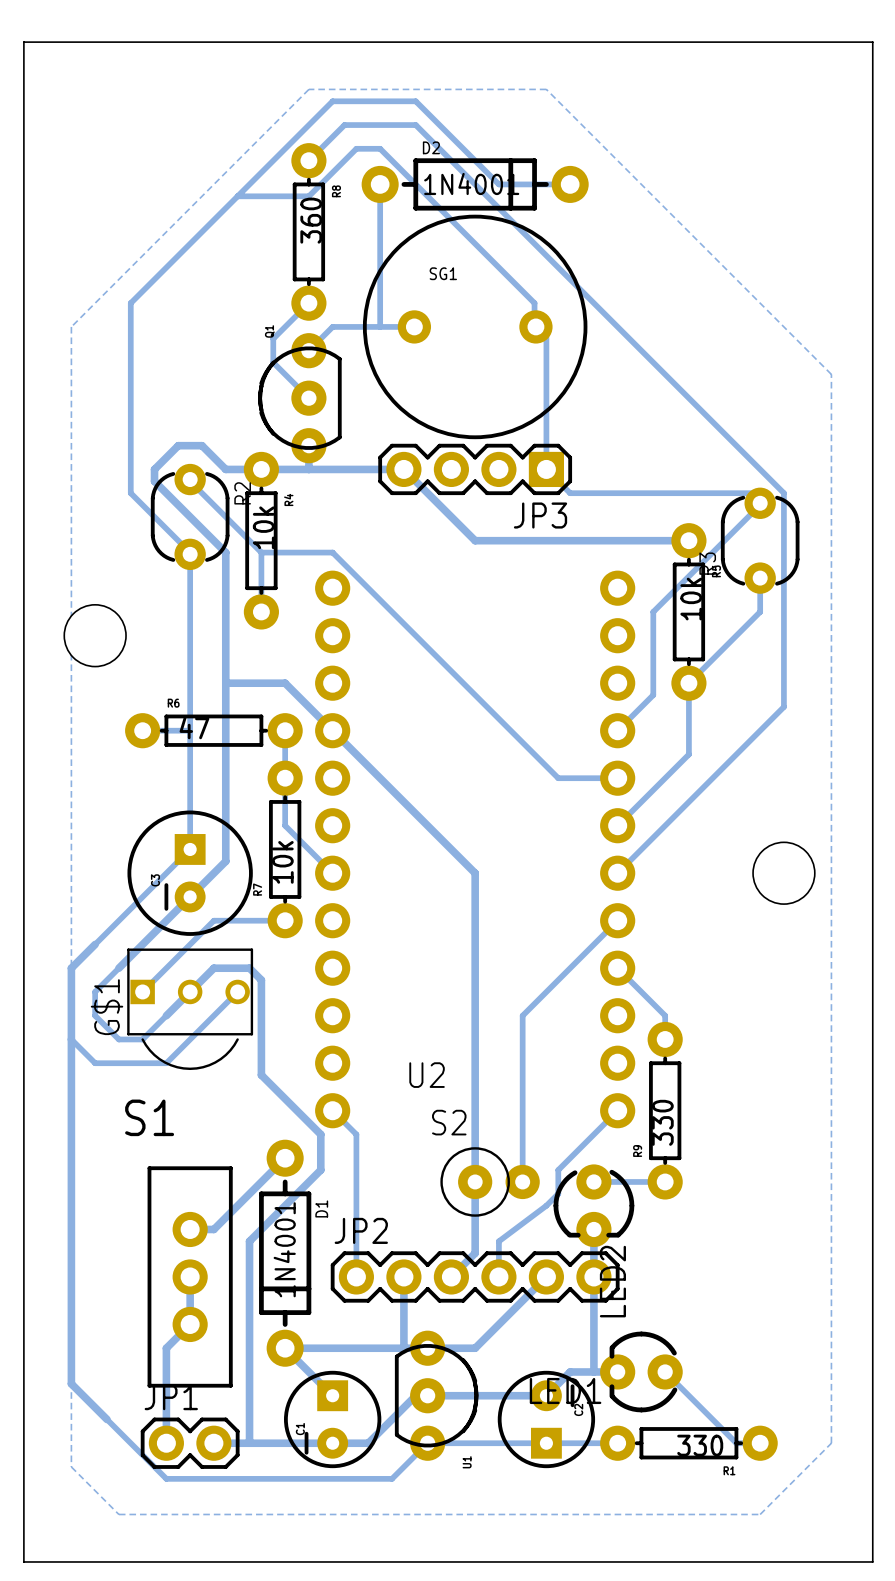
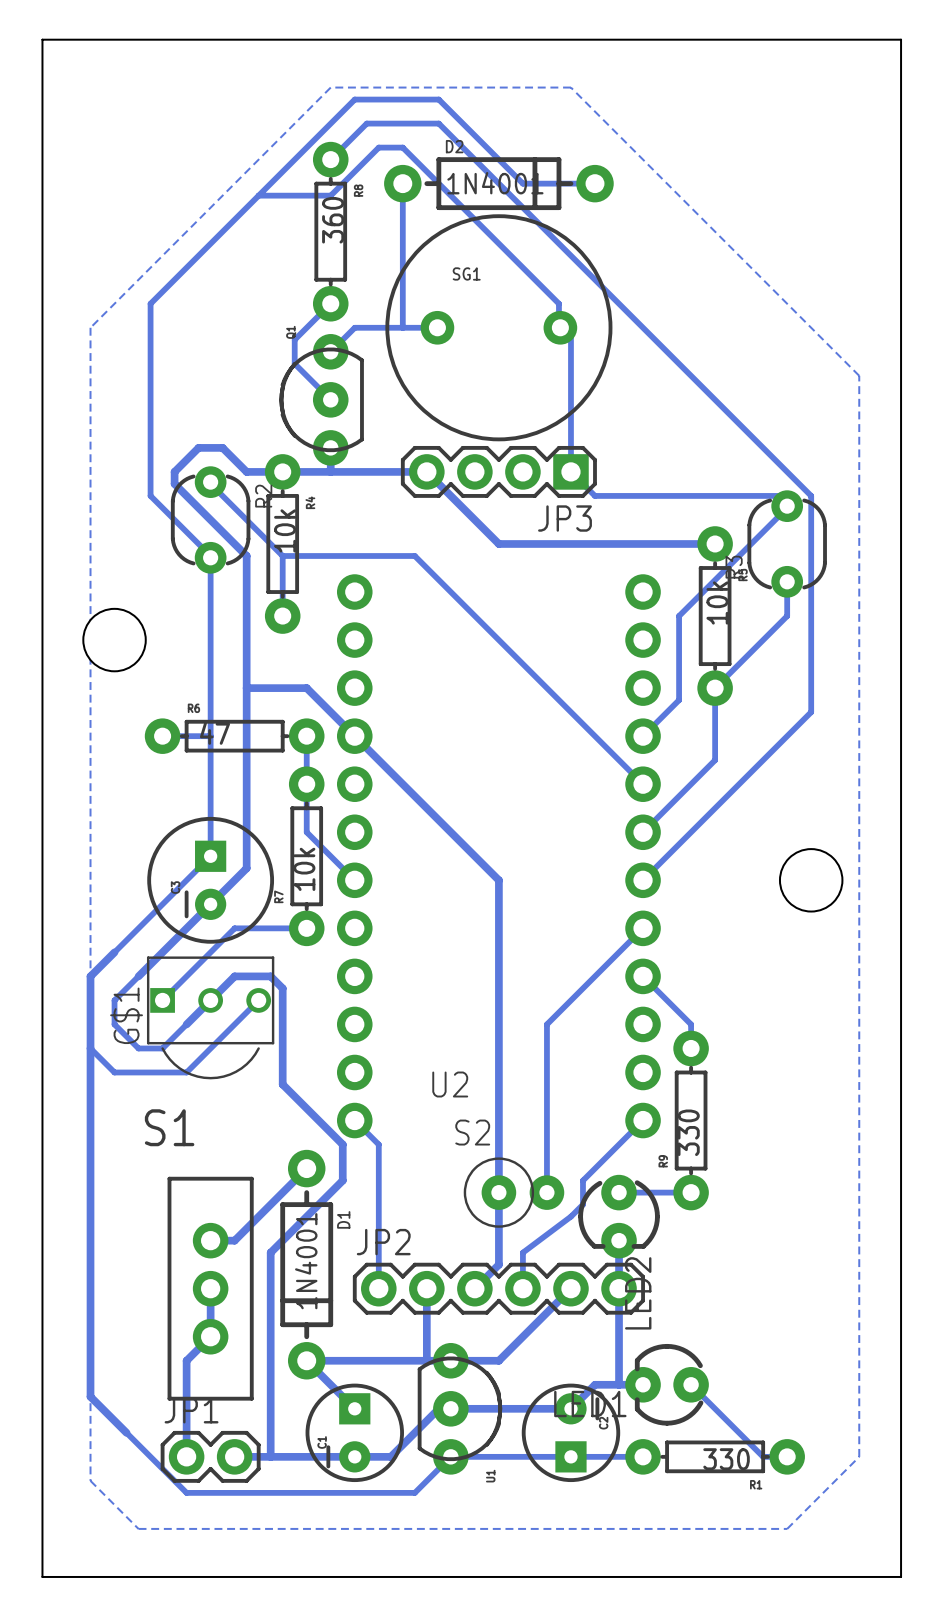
bottom track: (332, 552) (558, 778) (617, 778) -> (354, 556) (414, 556) (643, 784)

